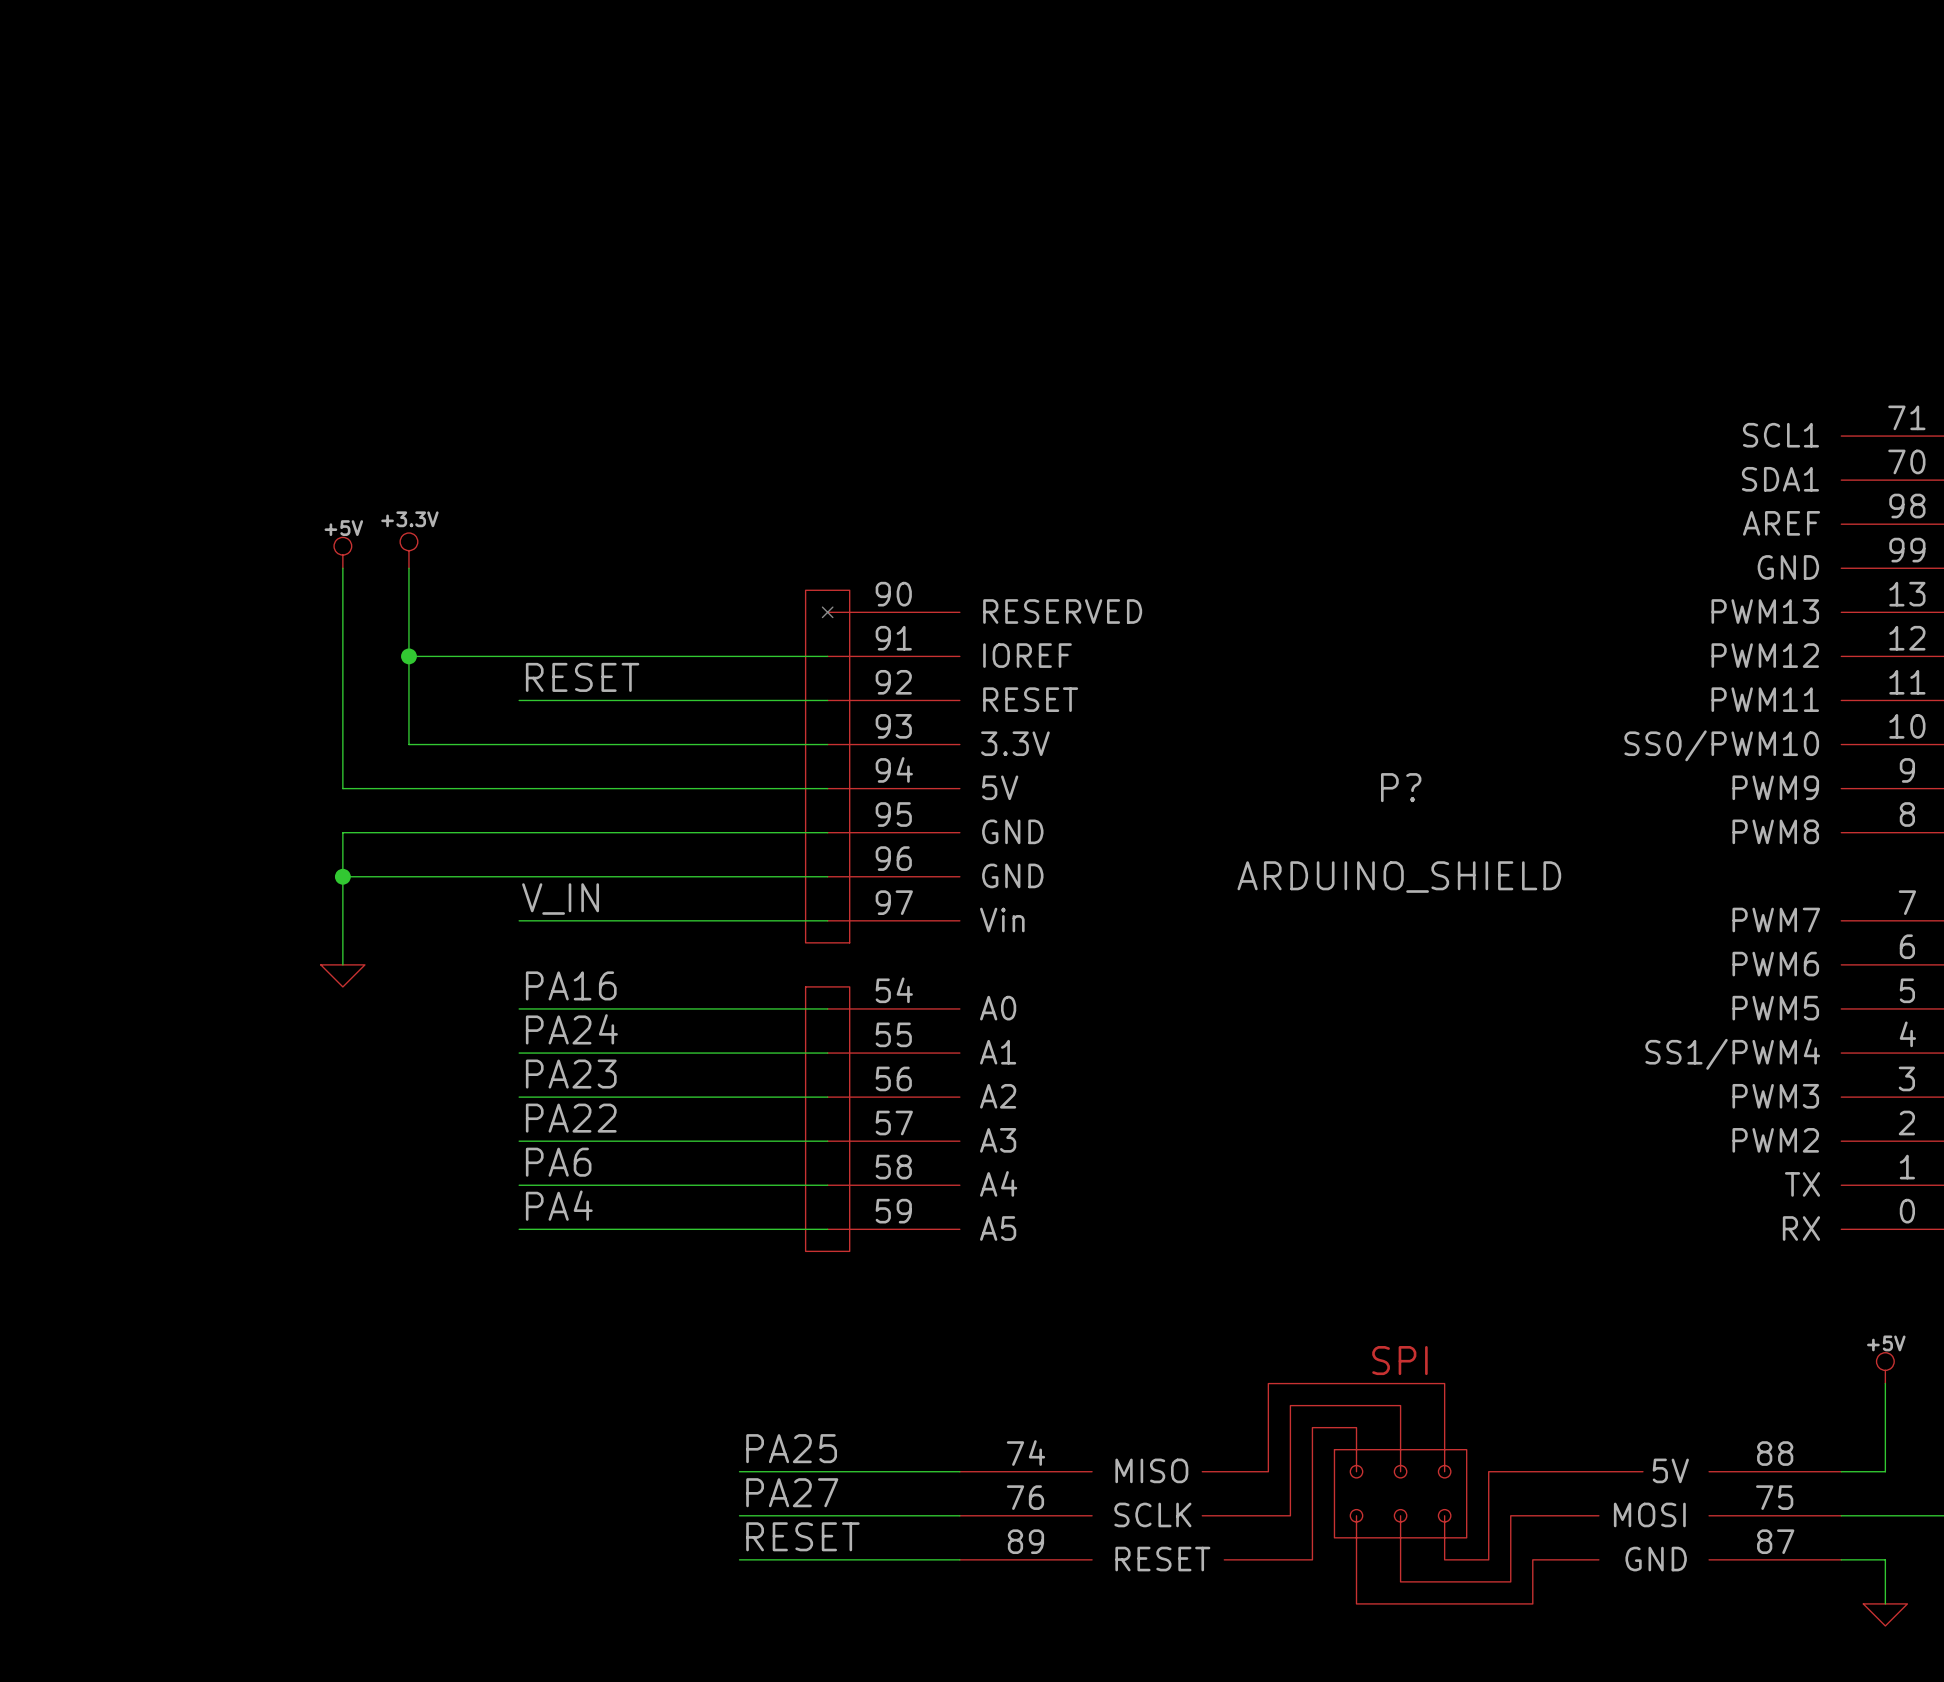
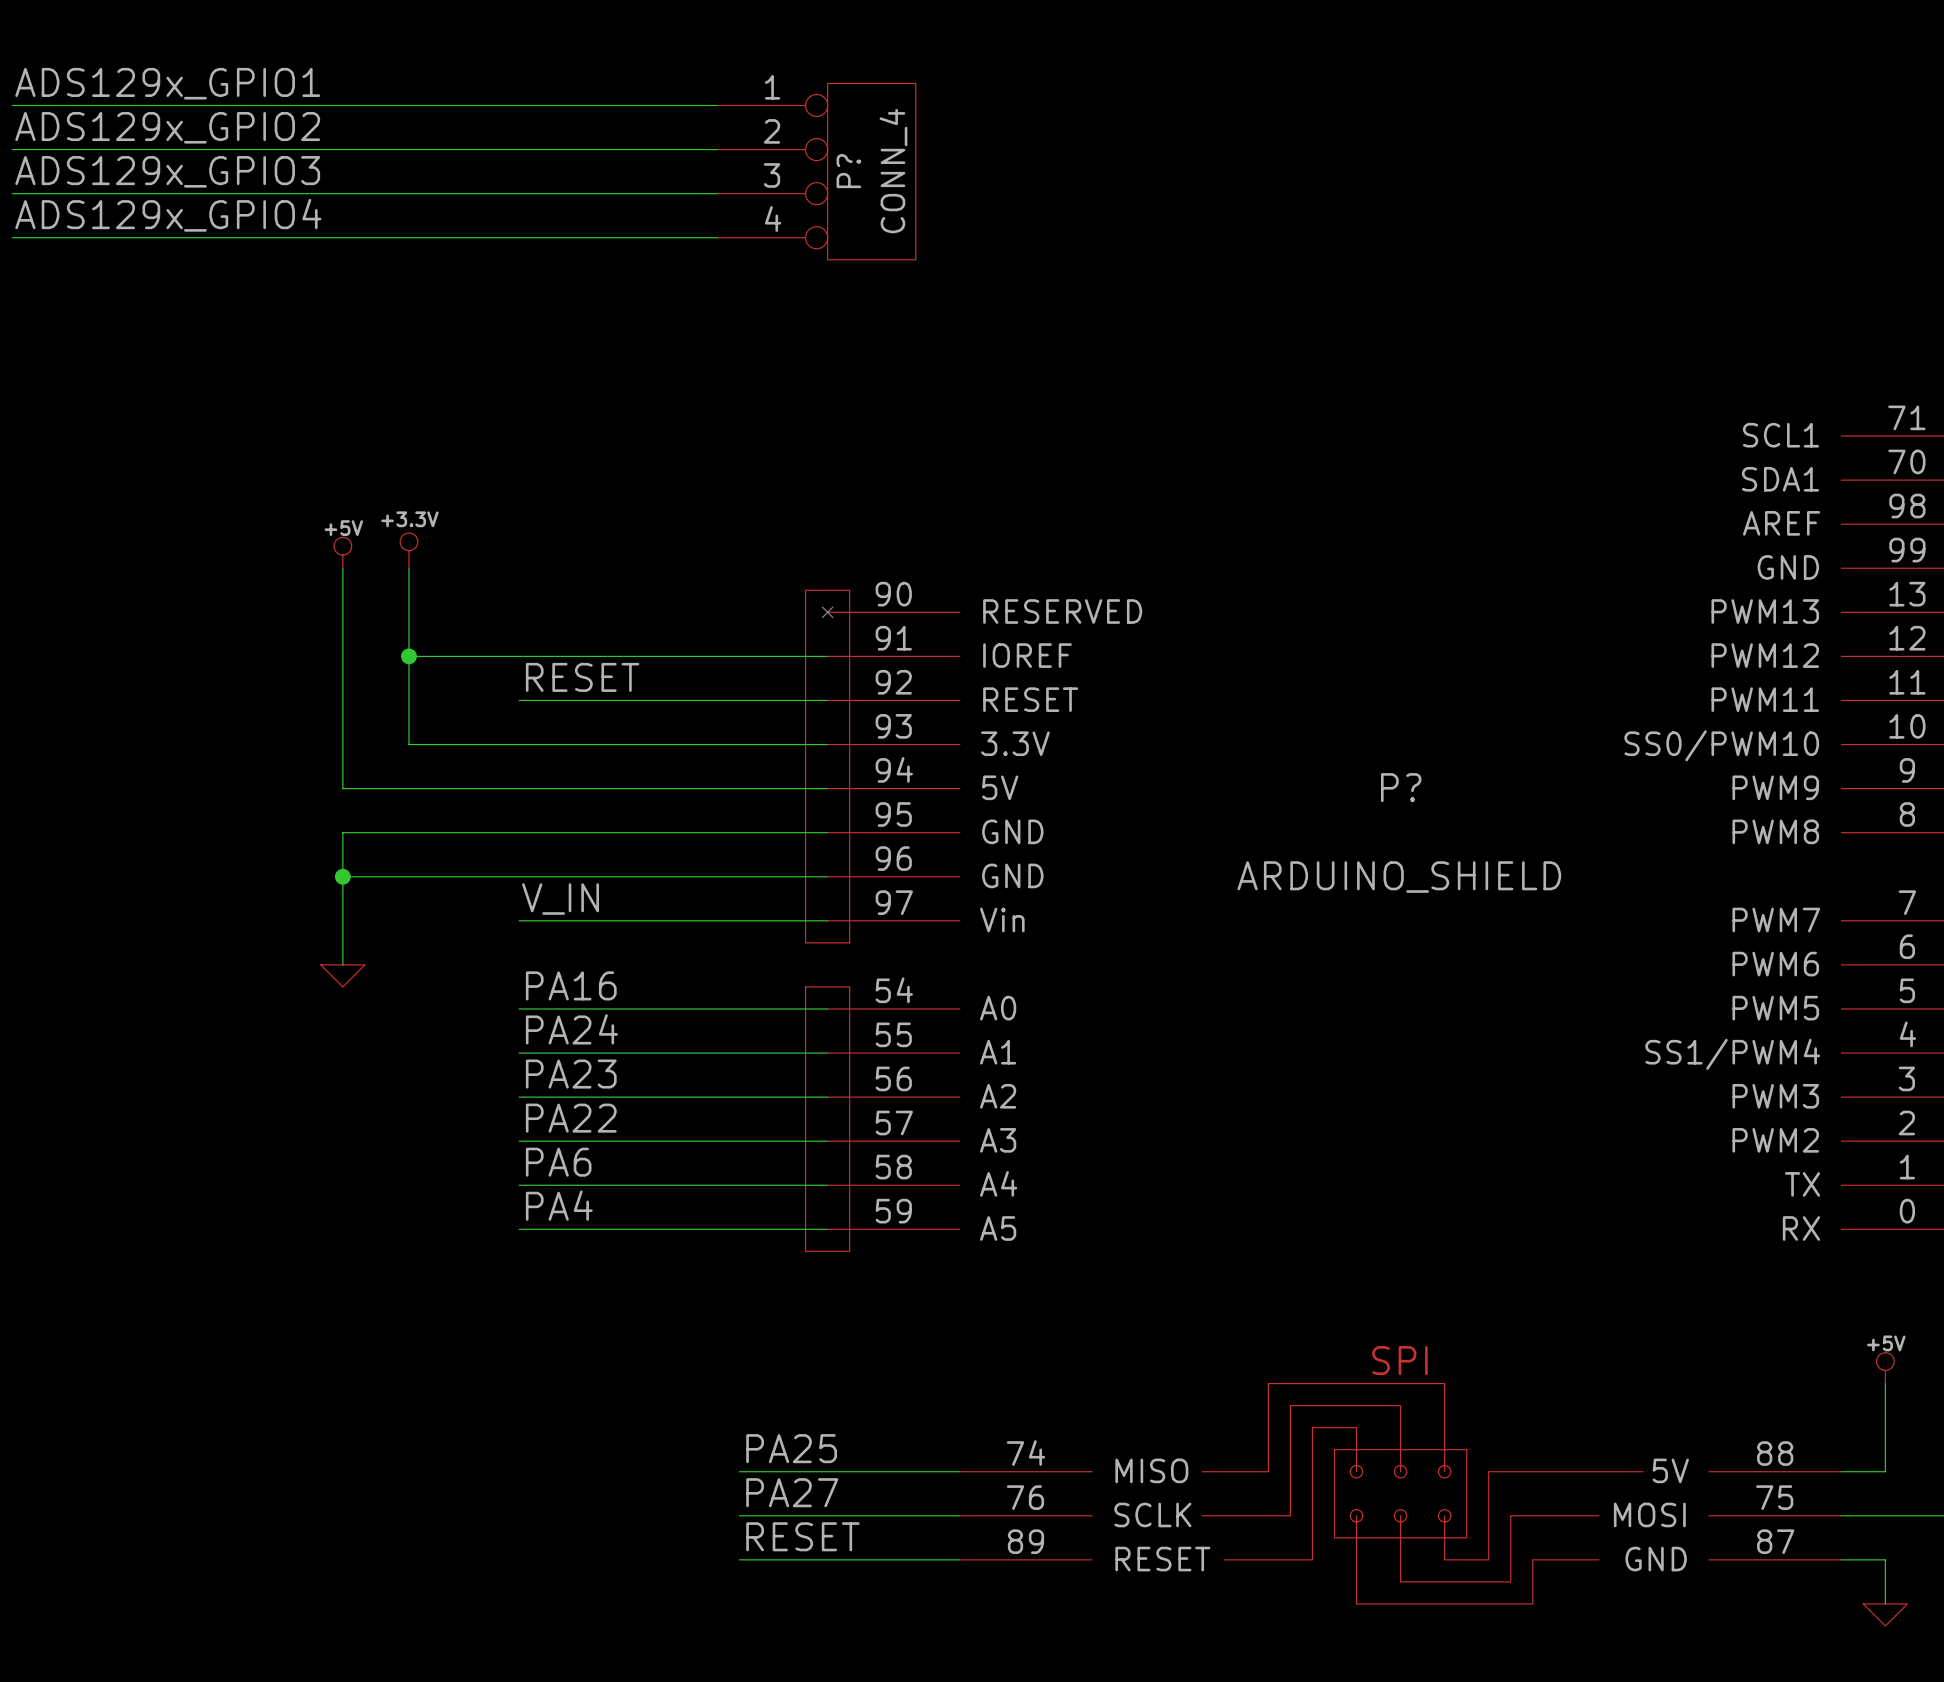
label: none -> ADS129x_GPIO1 (167, 83)
wire: none -> (12, 105) (717, 105)
label: none -> ADS129x_GPIO2 (167, 127)
wire: none -> (12, 149) (717, 149)
label: none -> ADS129x_GPIO3 (167, 171)
P?: none -> CONN_4 (816, 171)
wire: none -> (12, 193) (717, 193)
label: none -> ADS129x_GPIO4 (168, 215)
wire: none -> (12, 237) (717, 237)

